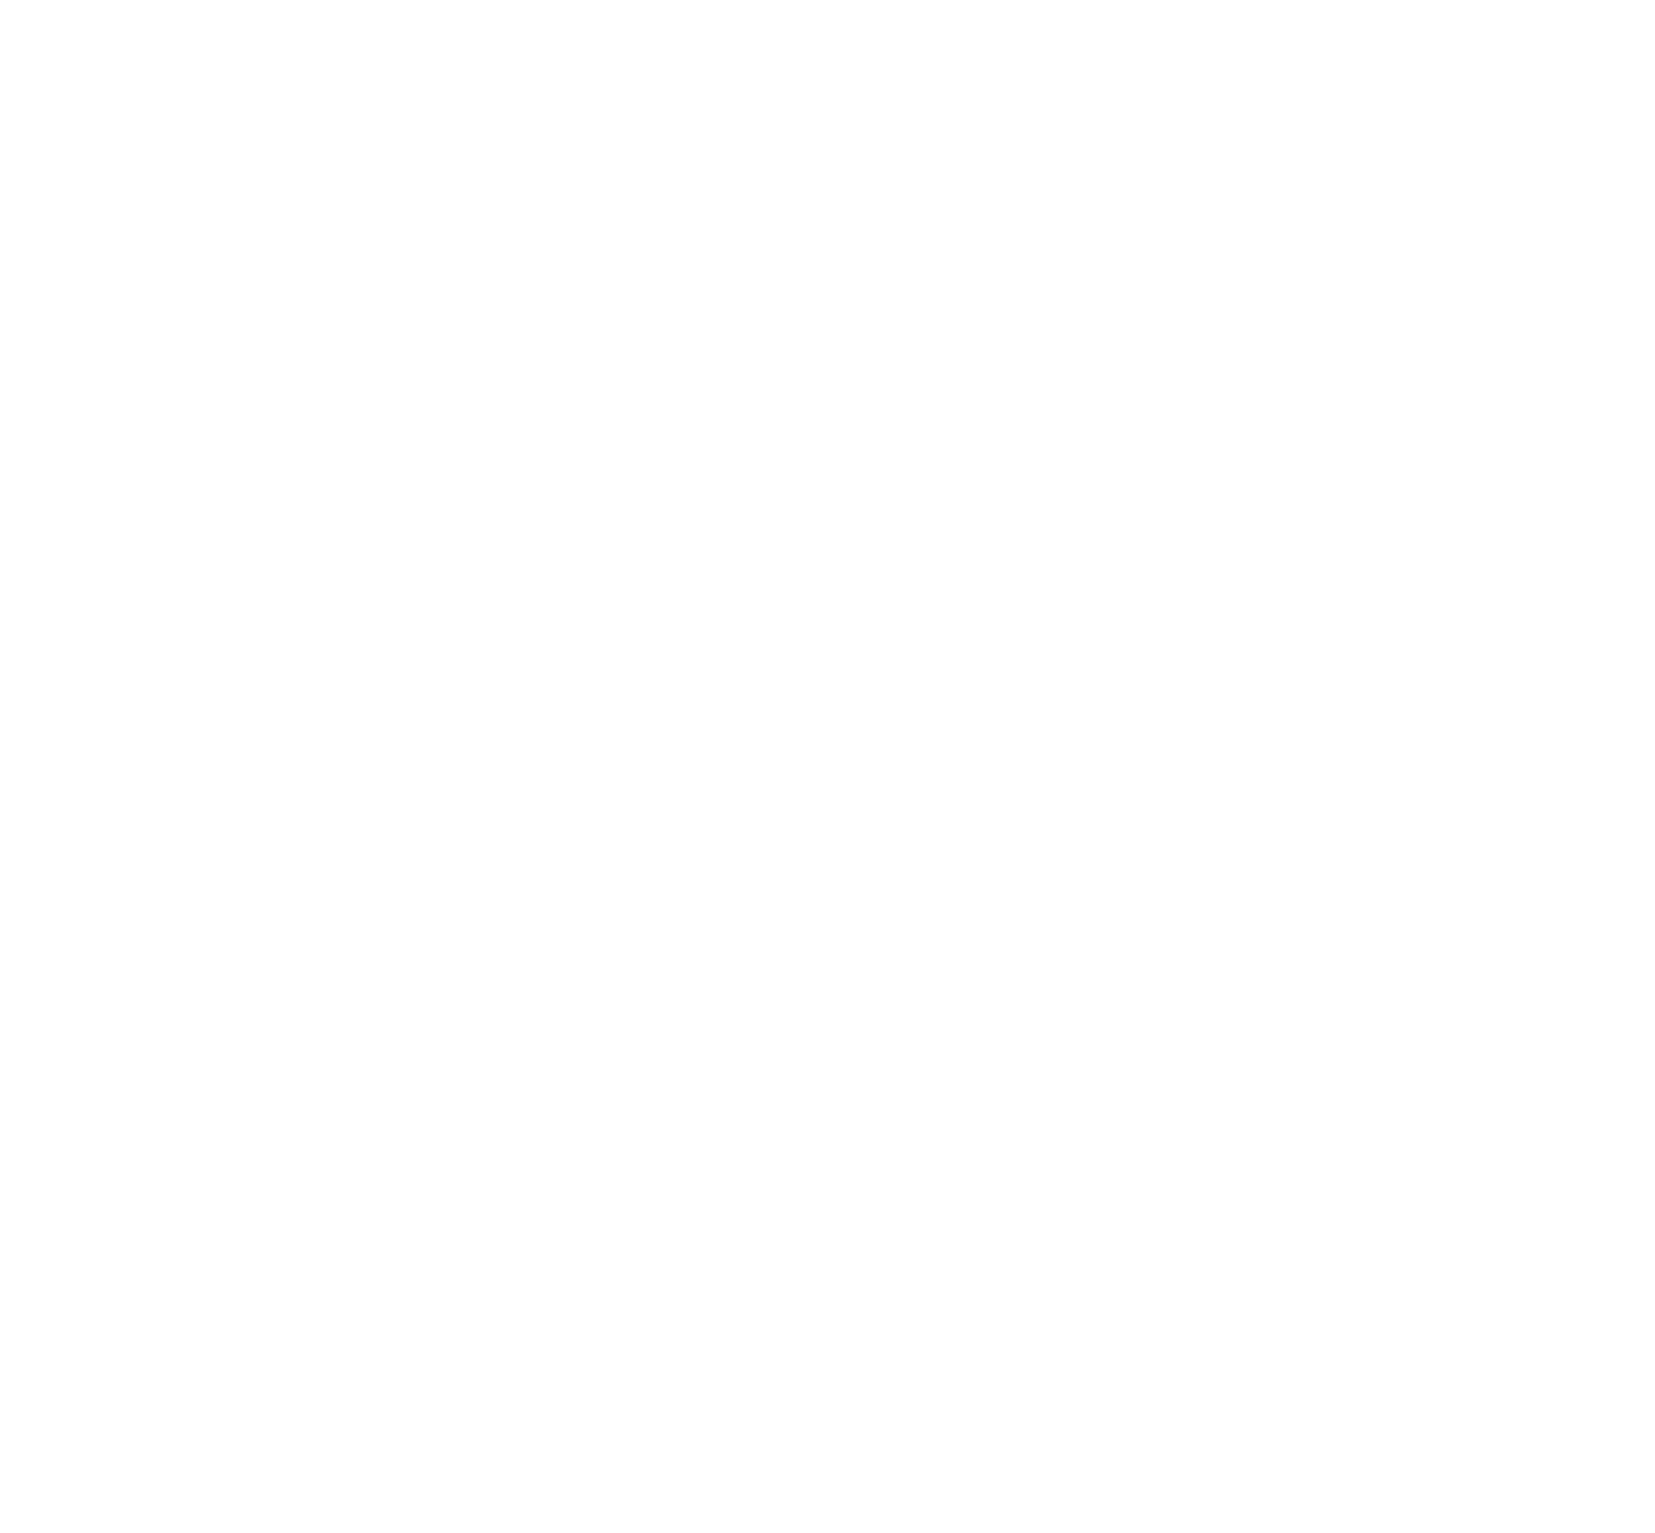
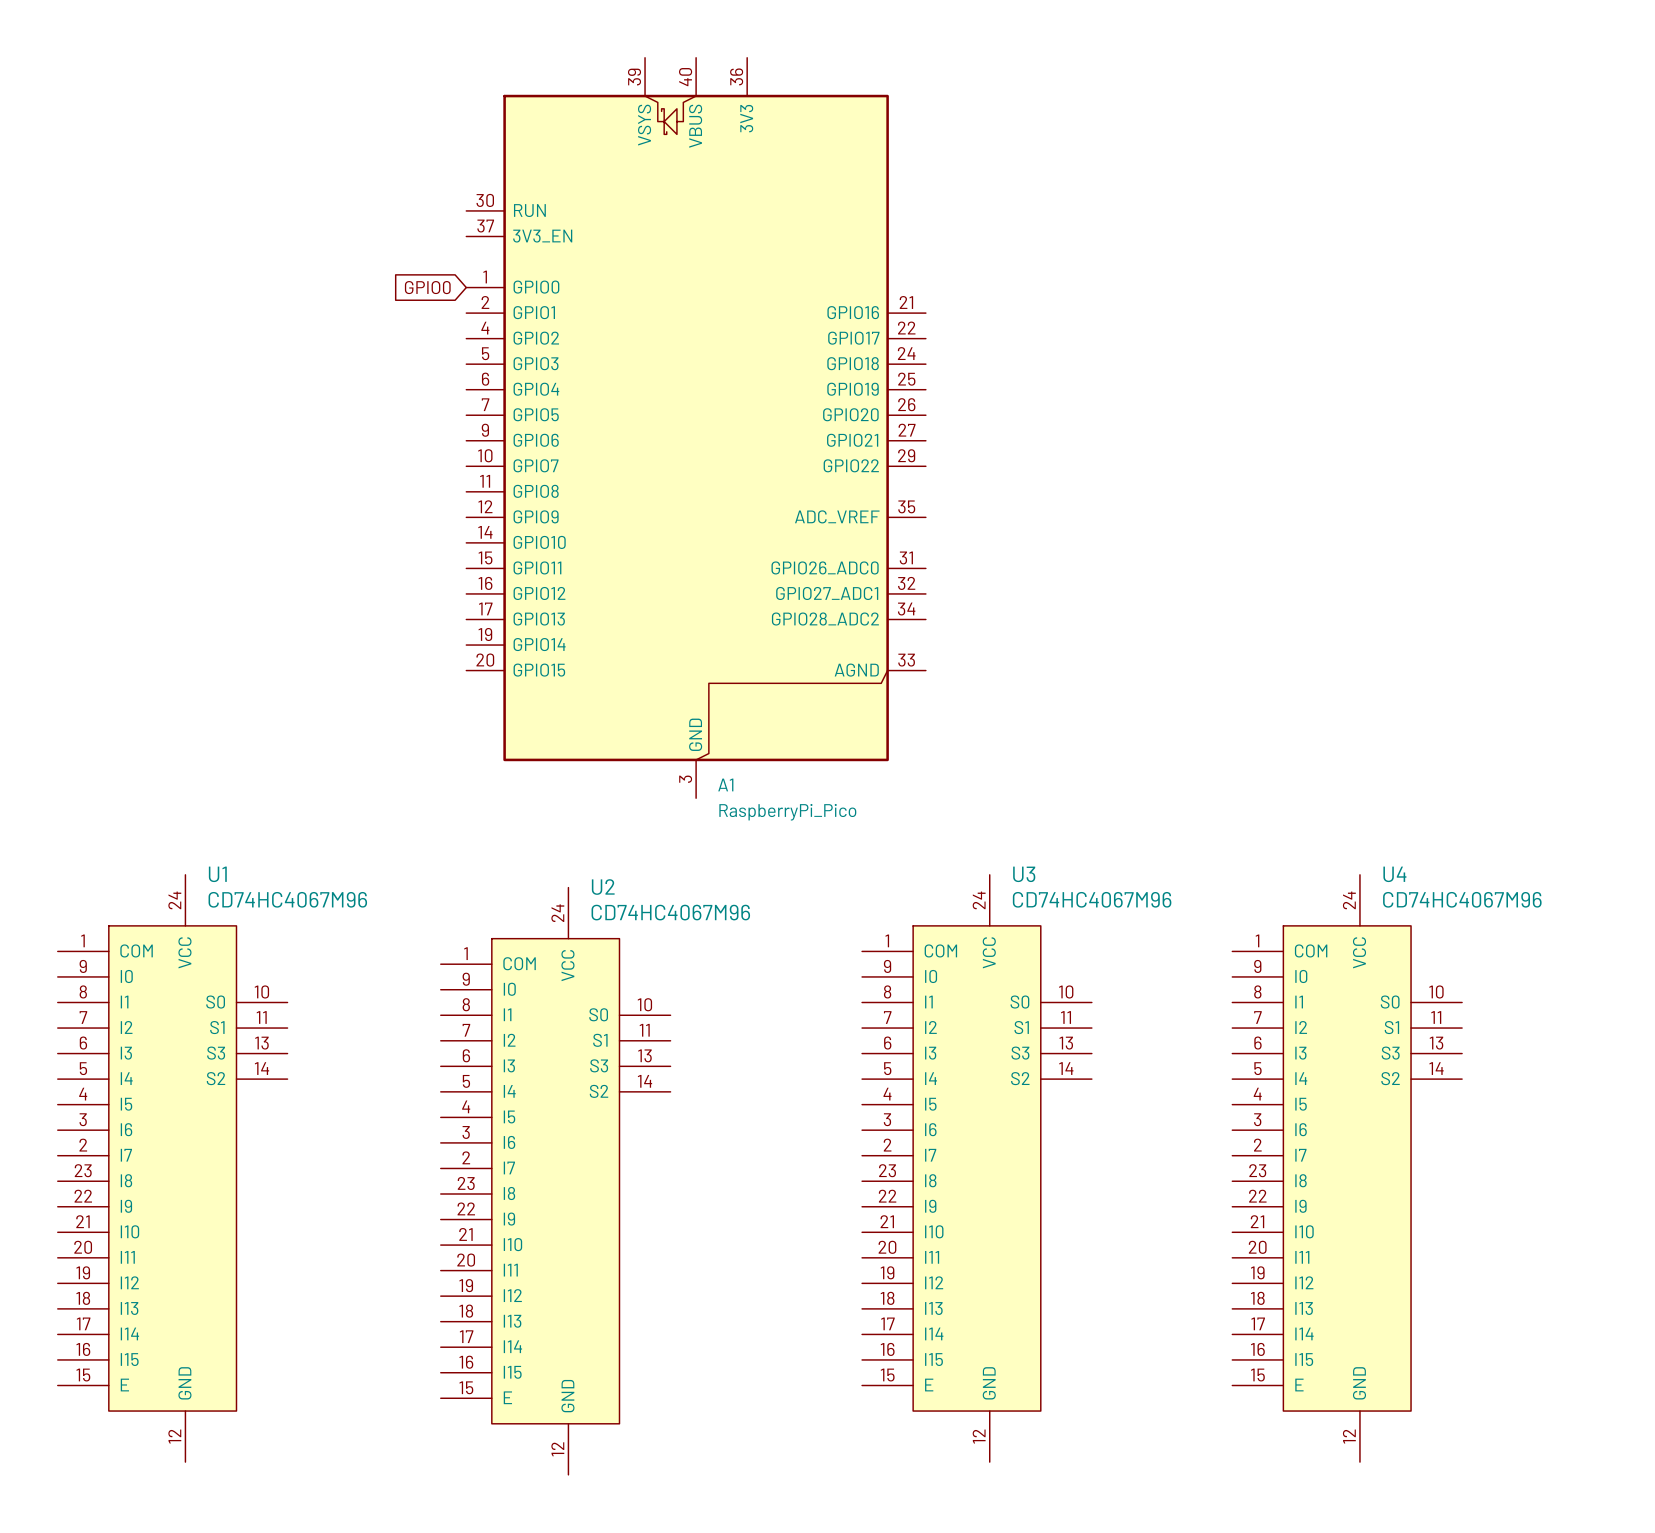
global label: none -> GPIO0 (427, 287)
A1: none -> RaspberryPi_Pico (696, 427)
U1: none -> CD74HC4067M96 (172, 1168)
U3: none -> CD74HC4067M96 (976, 1168)
U4: none -> CD74HC4067M96 (1347, 1168)
U2: none -> CD74HC4067M96 (555, 1181)

